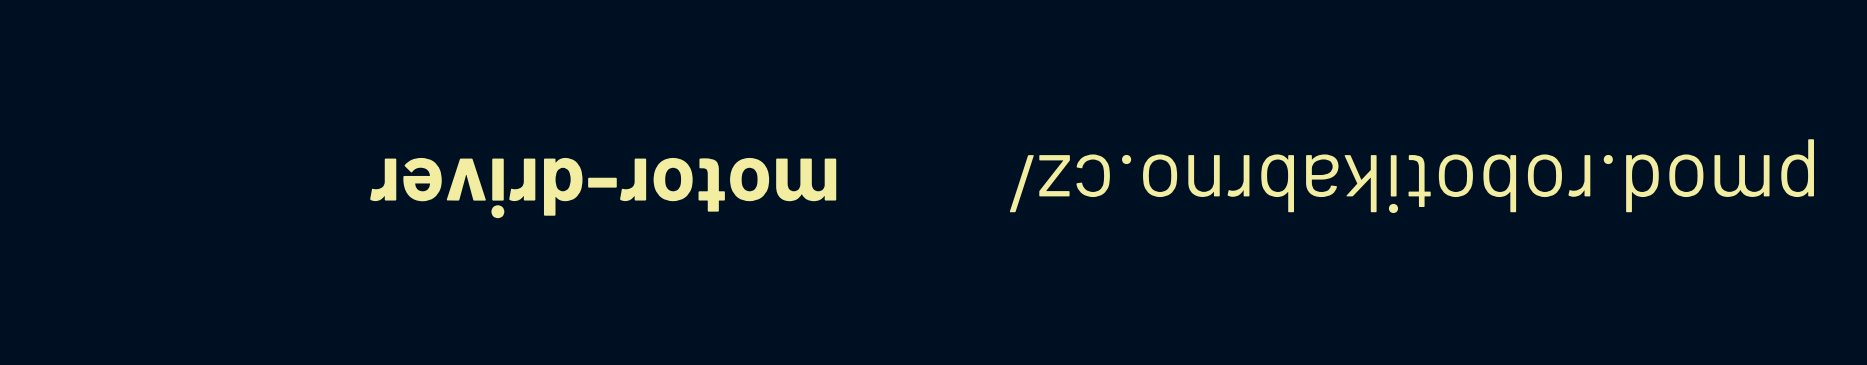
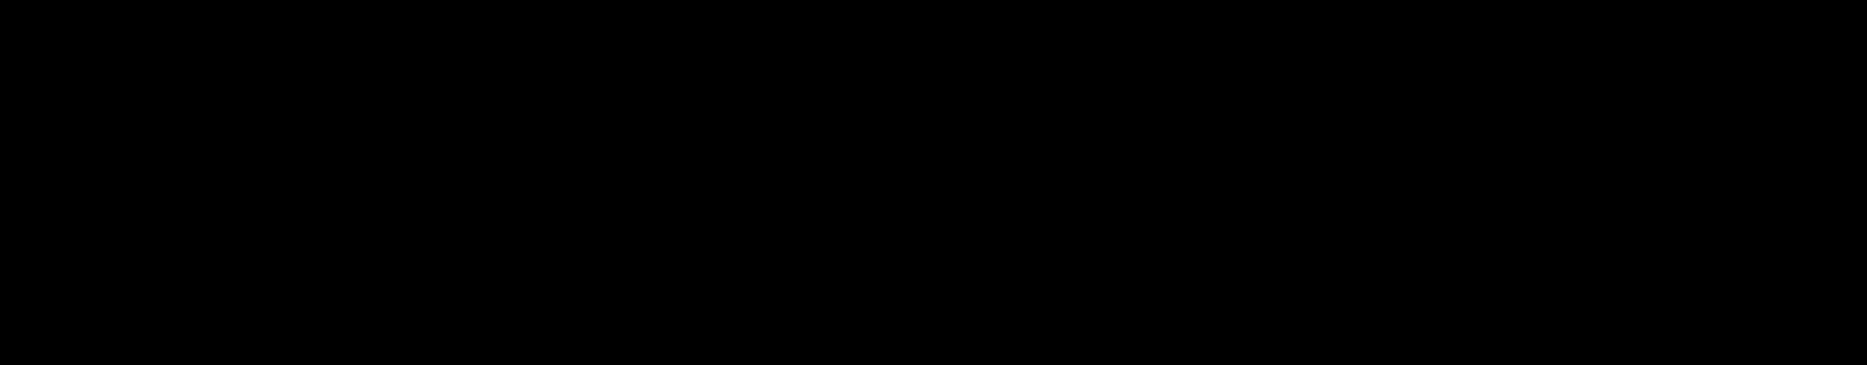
text: pmod.robotikabrno.cz/ (1411, 176) -> none
text: motor-driver (603, 188) -> none

